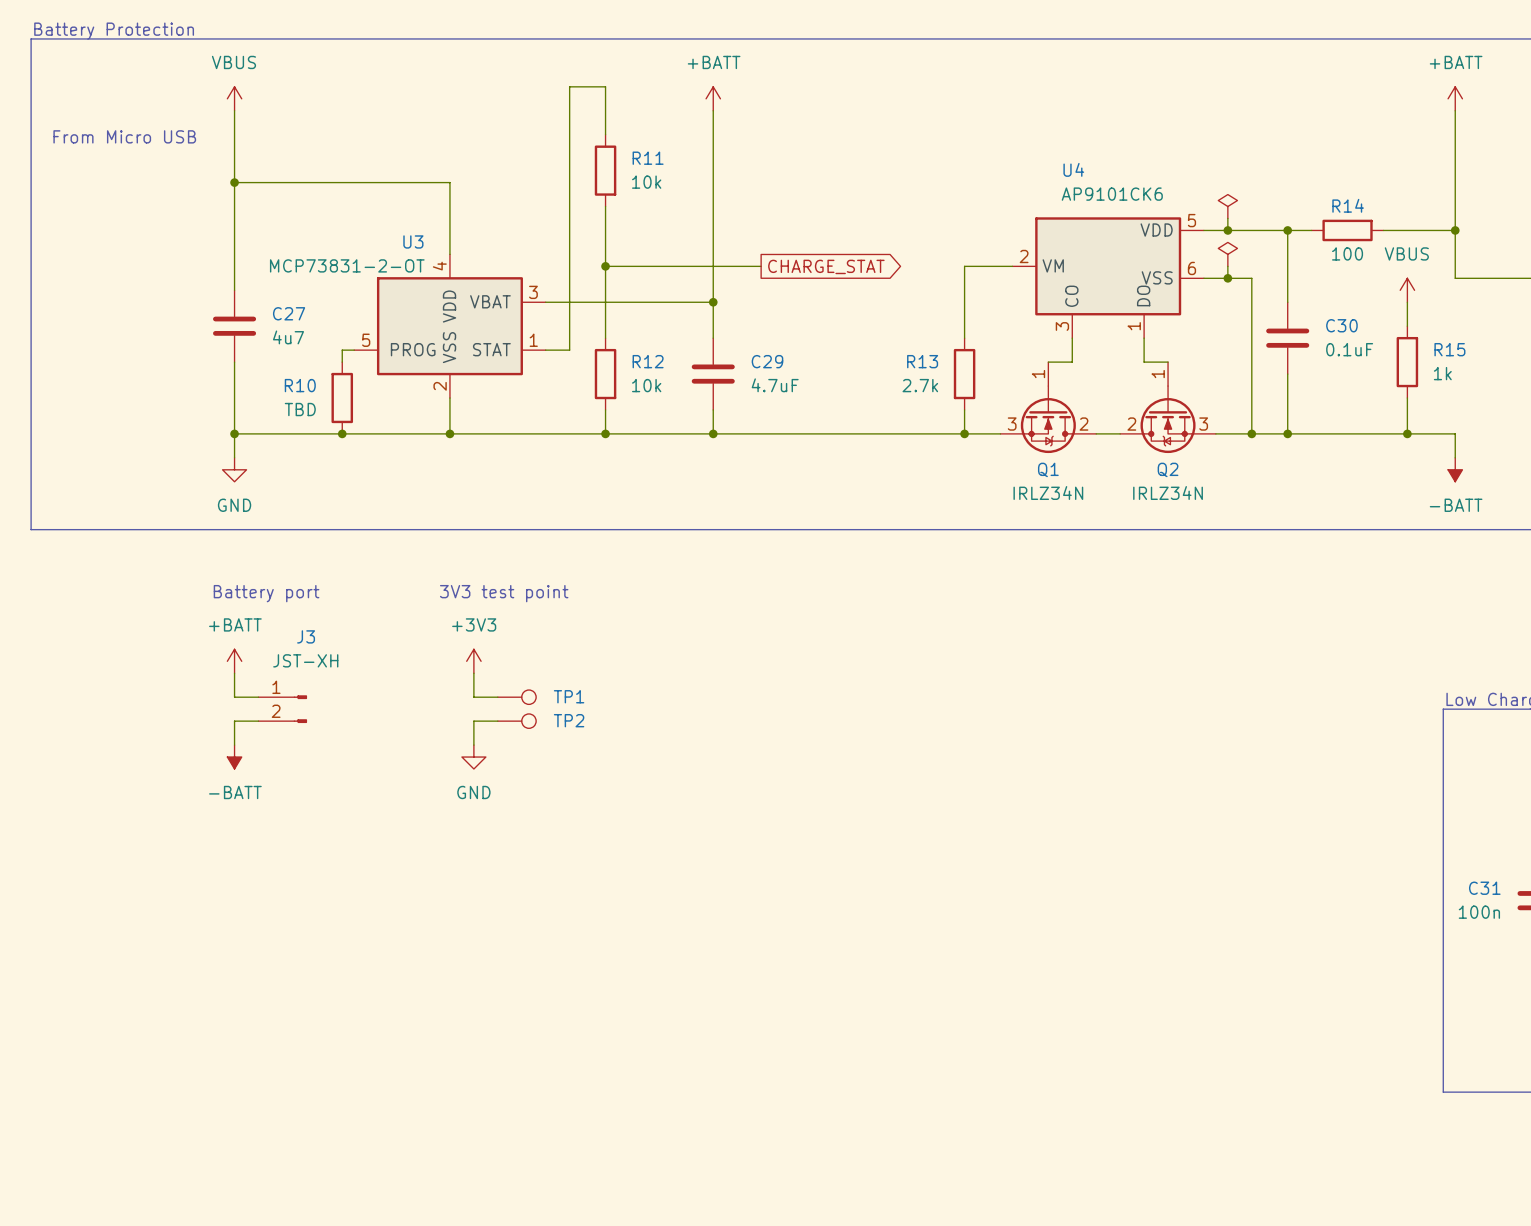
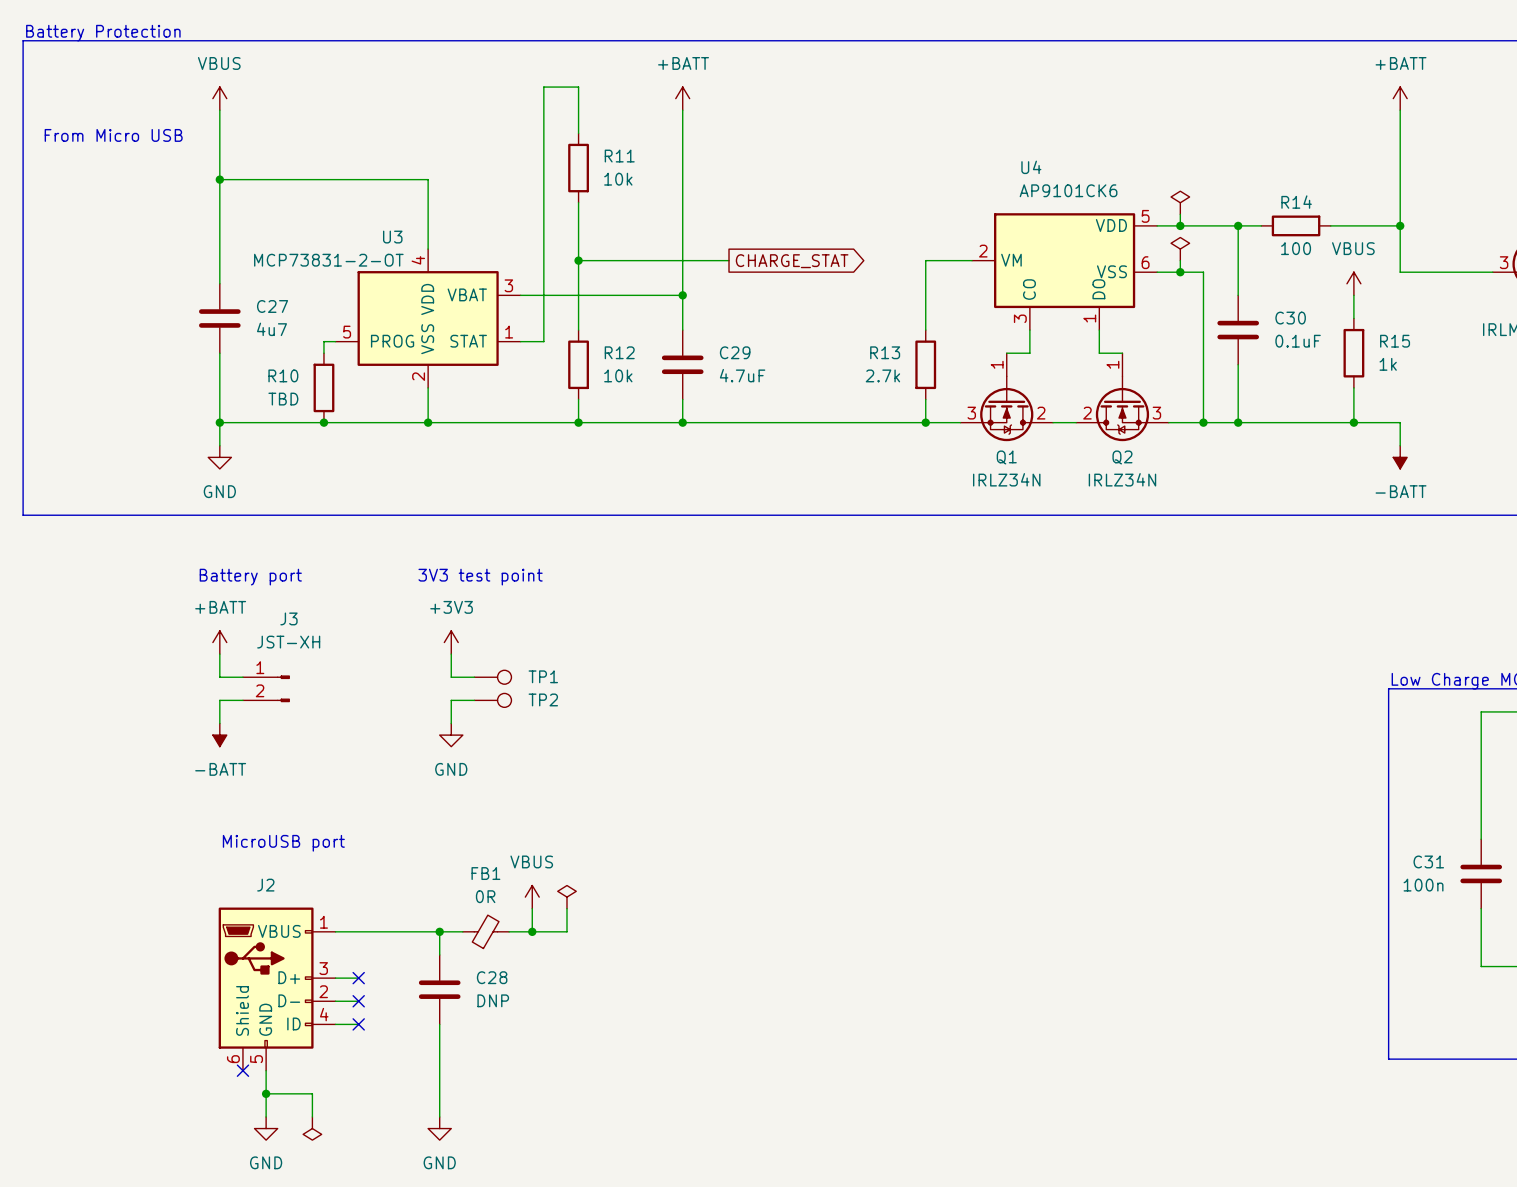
text: none -> MicroUSB port (283, 843)
power symbol: none -> VBUS (532, 897)
power symbol: none -> (566, 897)
wire: none -> (532, 908) (532, 931)
wire: none -> (566, 908) (566, 931) (509, 931)
wire: none -> (335, 931) (462, 931)
wire: none -> (439, 931) (439, 954)
junction: none -> (439, 931)
FB1: none -> 0R (485, 931)
junction: none -> (532, 931)
wire: none -> (335, 978) (358, 978)
no-connect mark: none -> (358, 978)
J2: none -> (277, 989)
C28: none -> DNP (439, 989)
wire: none -> (335, 1001) (358, 1001)
no-connect mark: none -> (358, 1001)
wire: none -> (335, 1024) (358, 1024)
no-connect mark: none -> (358, 1024)
wire: none -> (439, 1024) (439, 1116)
no-connect mark: none -> (242, 1070)
wire: none -> (266, 1070) (266, 1116)
wire: none -> (266, 1093) (312, 1093) (312, 1116)
junction: none -> (266, 1093)
power symbol: none -> GND (266, 1128)
power symbol: none -> (312, 1128)
power symbol: none -> GND (439, 1128)

